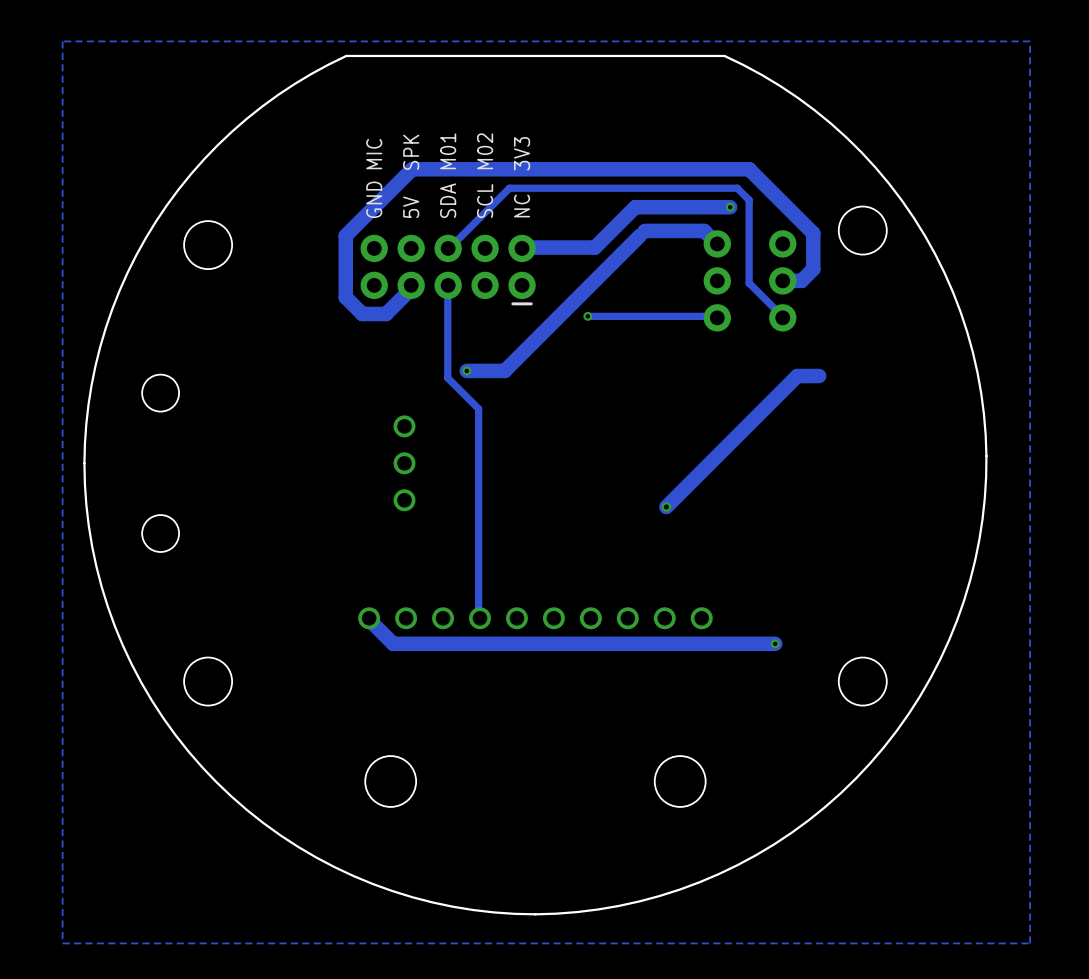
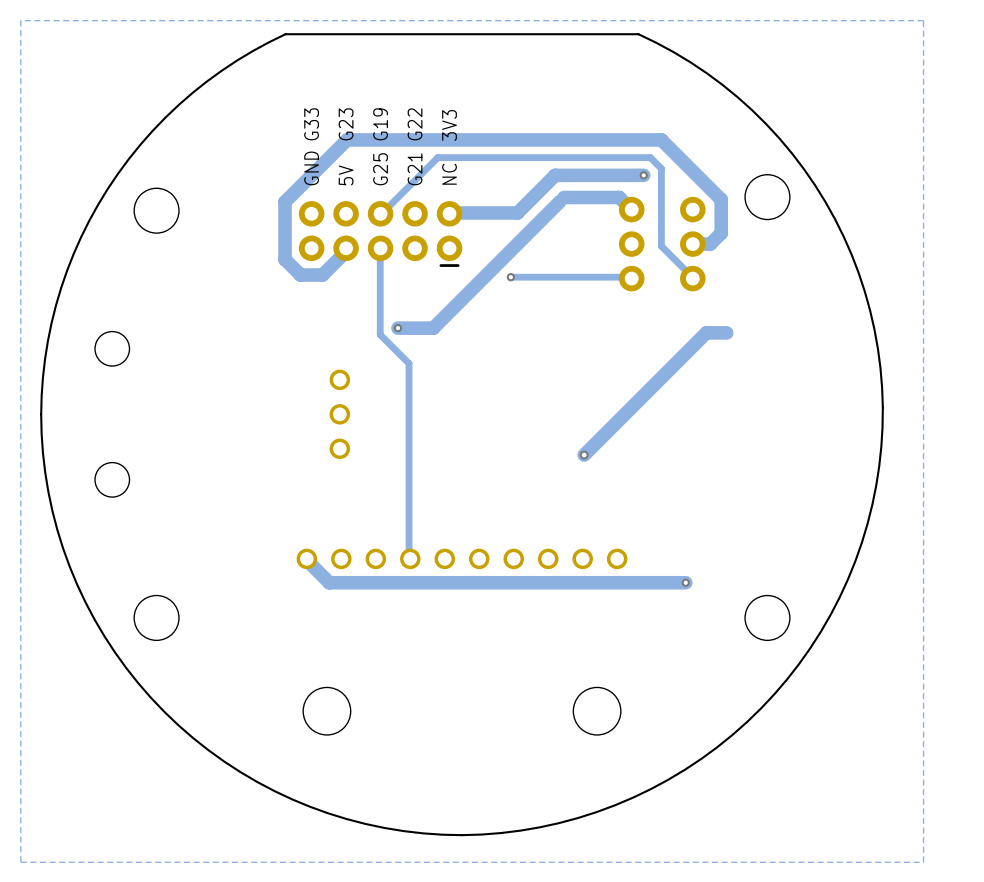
text: M01 (448, 151) -> G19 (380, 124)
text: M02 (485, 151) -> G22 (415, 124)
text: SPK (411, 152) -> G23 (346, 124)
text: MIC (374, 154) -> G33 (311, 124)
text: SDA (448, 200) -> G25 (380, 169)
text: SCL (485, 201) -> G21 (415, 169)

